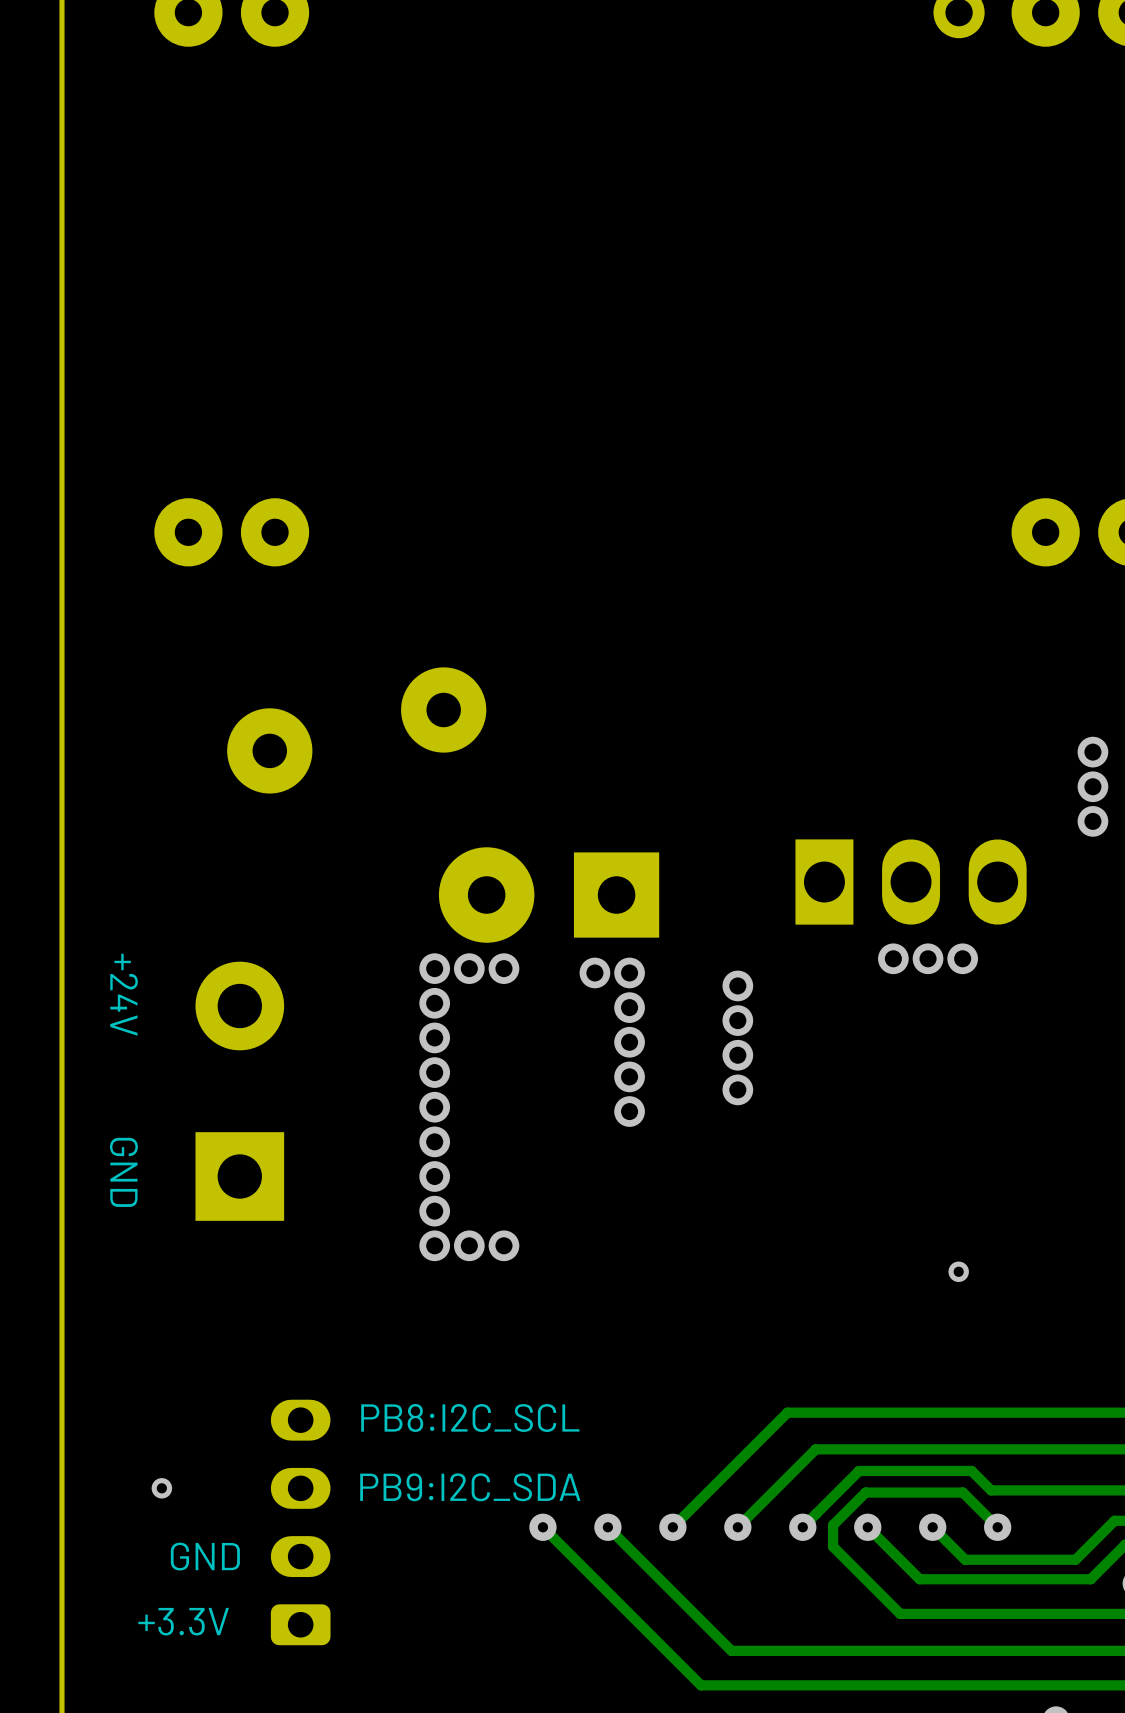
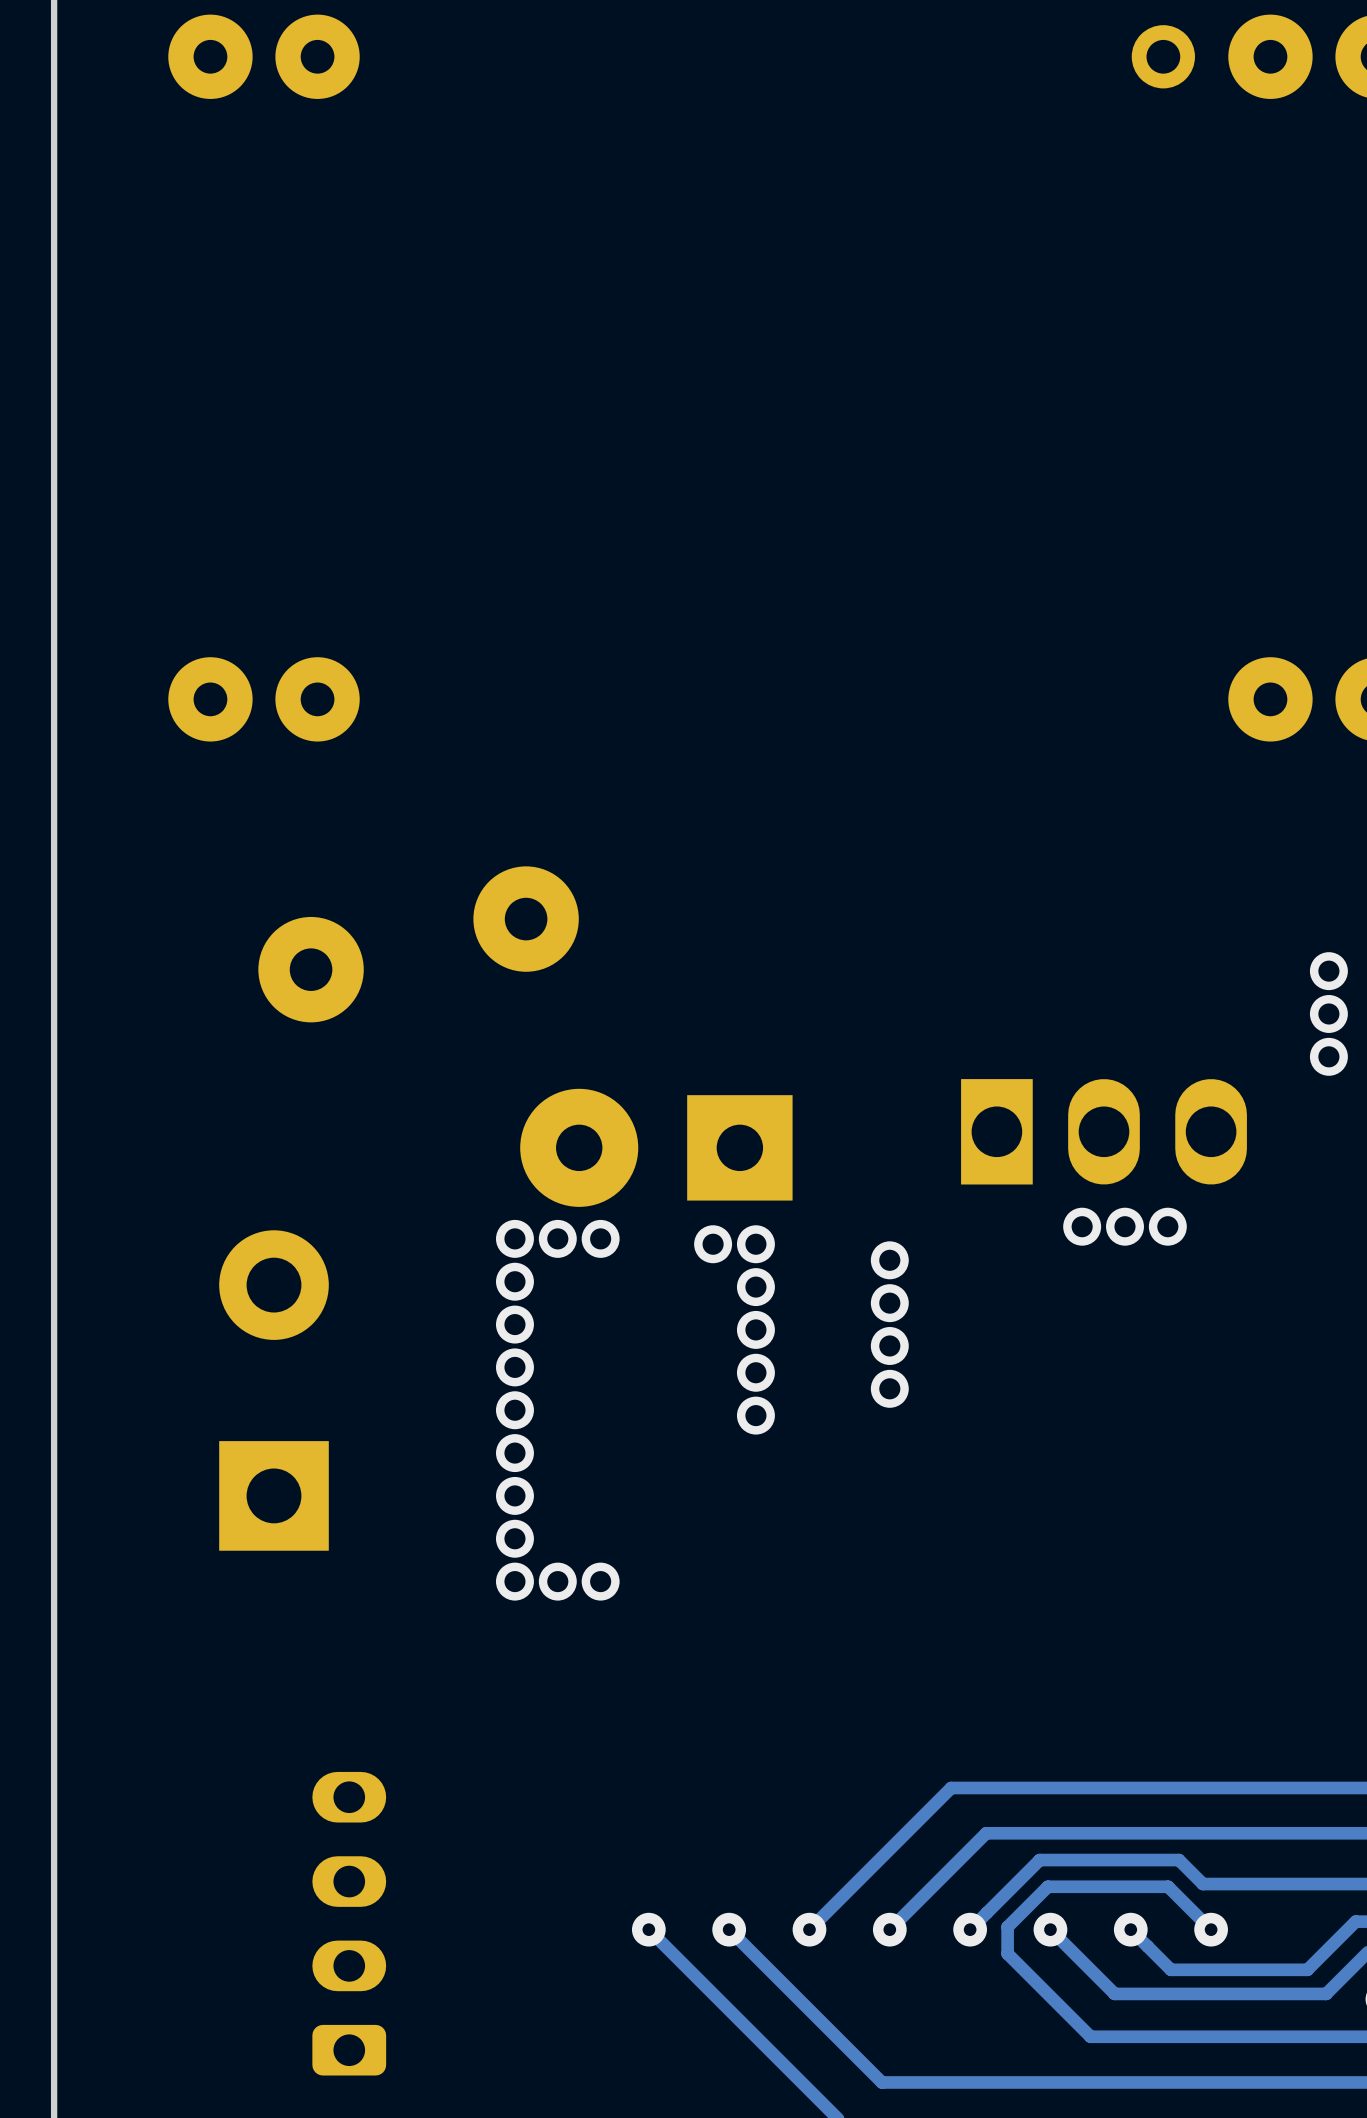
text: +24V (124, 994) -> none
text: GND (123, 1172) -> none
via: (958, 1271) -> none
text: PB8:I2C_SCL (470, 1417) -> none
text: PB9:I2C_SDA (470, 1487) -> none
via: (161, 1488) -> none
text: GND (205, 1556) -> none
text: +3.3V (183, 1621) -> none

